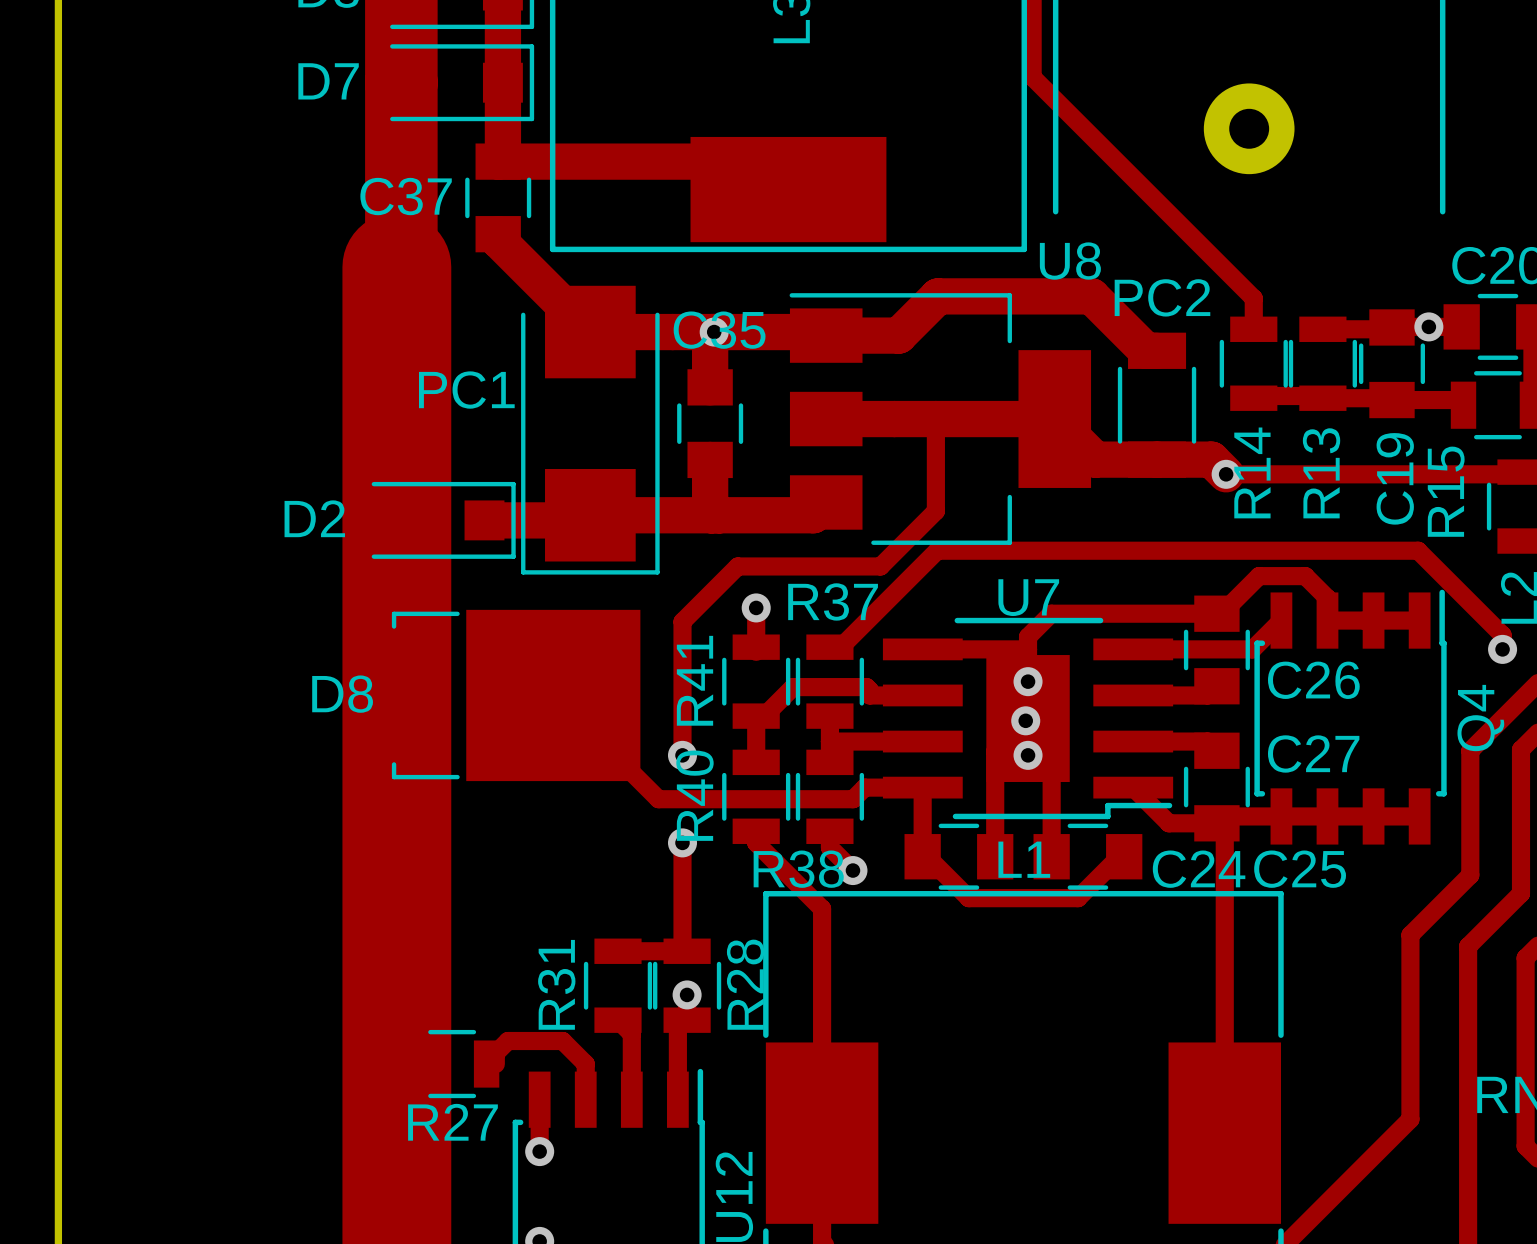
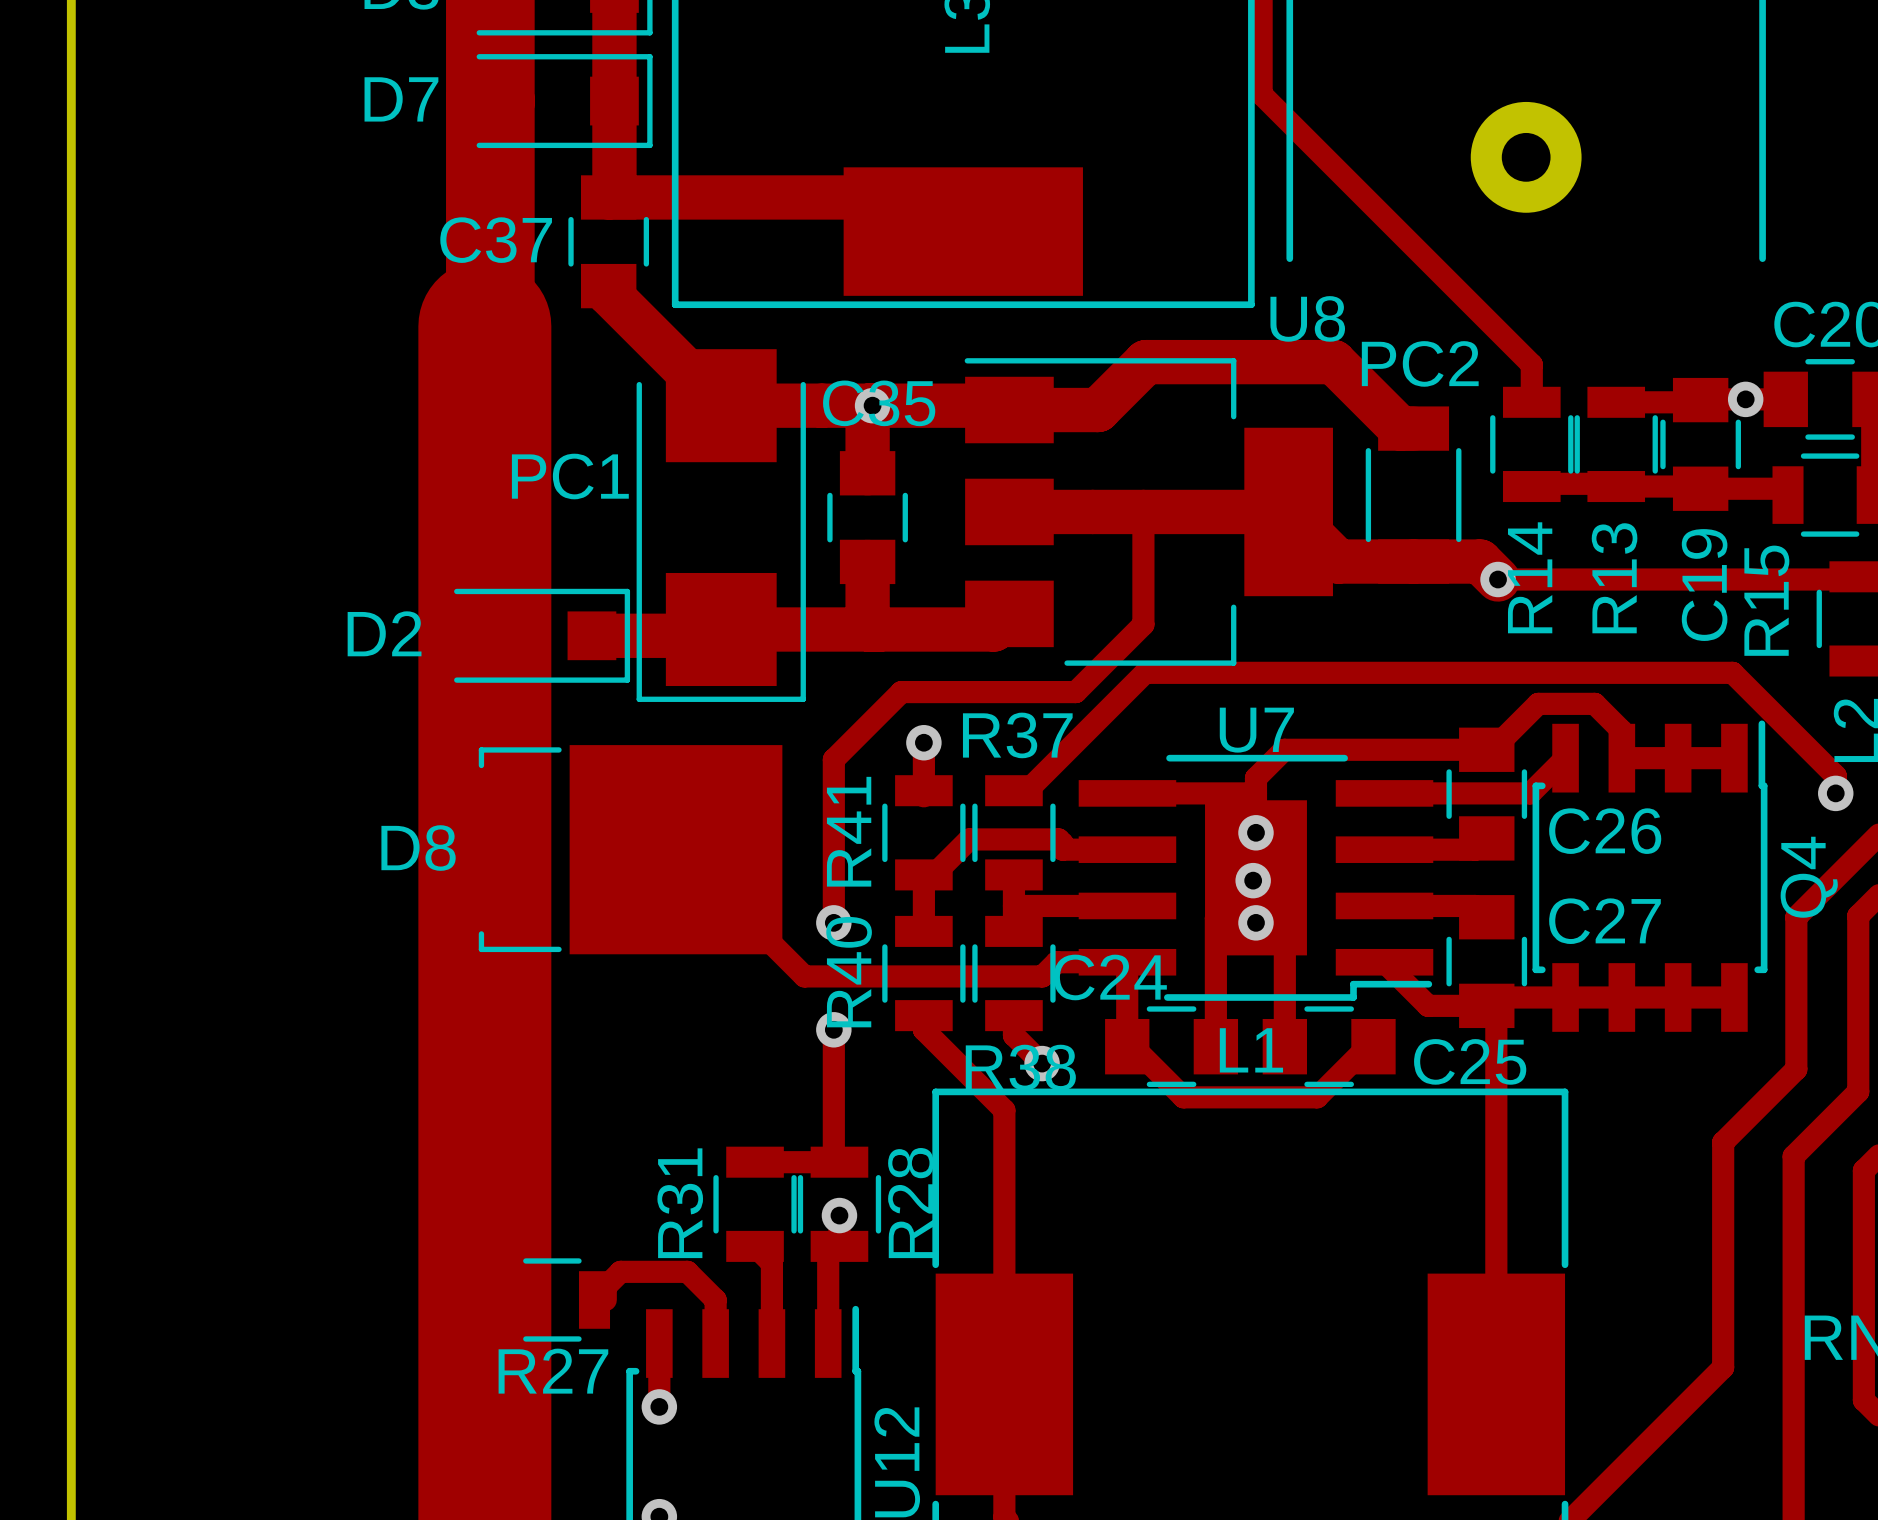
R38 name position: R38 (798, 869) -> R38 (1020, 1067)
C24 name position: C24 (1199, 869) -> C24 (1110, 977)
C25 name position: C25 (1300, 869) -> C25 (1470, 1061)

